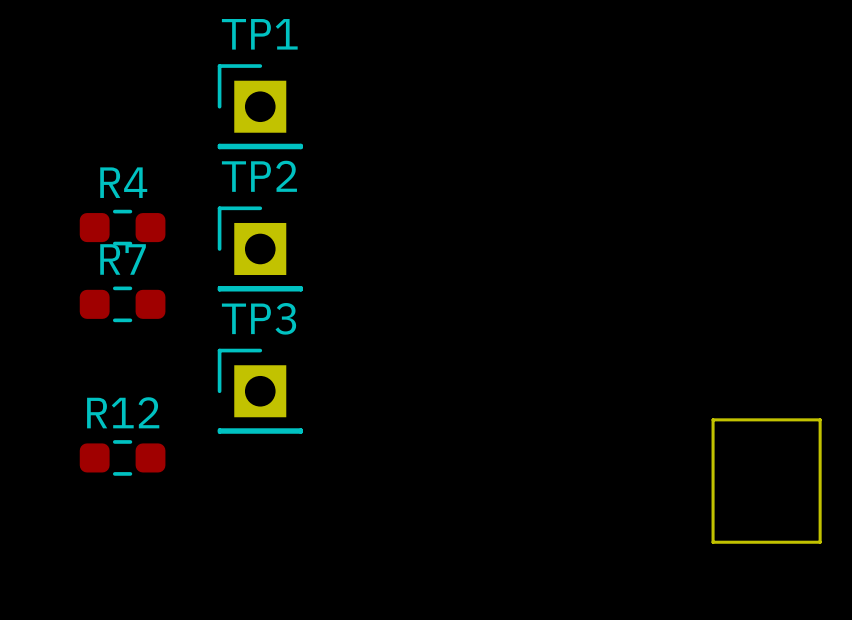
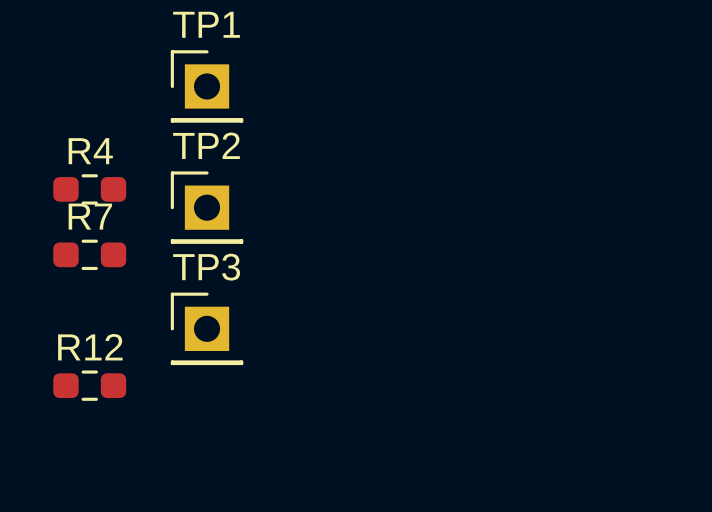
board edge: (713, 419) (820, 419) (820, 542) (713, 542) (713, 419) -> none

